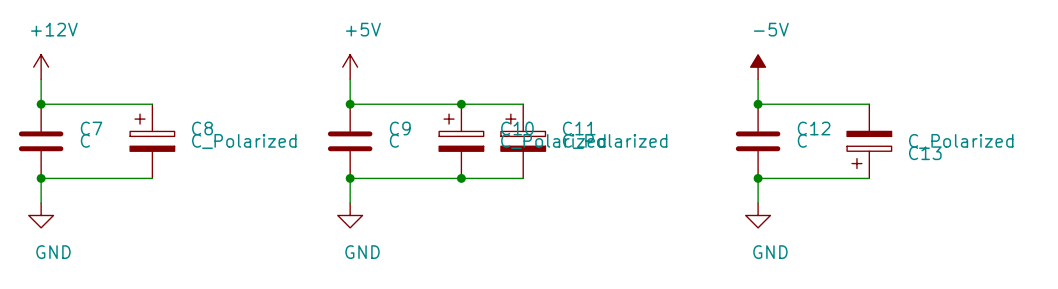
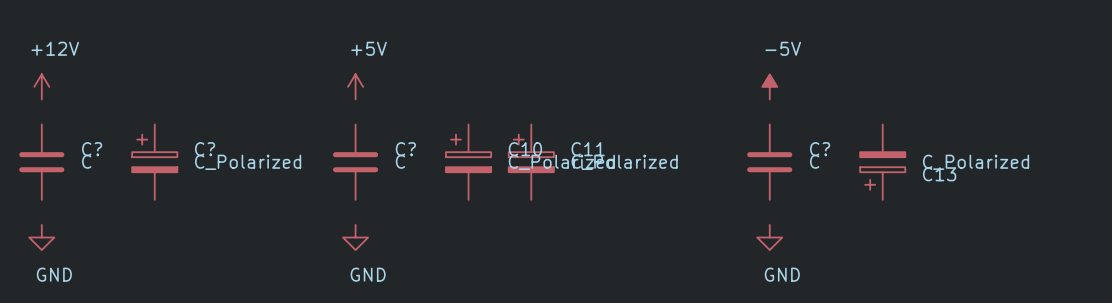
wire: (41, 79) (41, 104) (152, 104) -> none
wire: (350, 79) (350, 104) (523, 104) -> none
wire: (758, 79) (758, 104) (869, 104) -> none
junction: (41, 104) -> none
junction: (350, 104) -> none
junction: (461, 104) -> none
junction: (758, 104) -> none
C7 name: C7 (91, 128) -> C? (92, 149)
C8 name: C8 (202, 128) -> C? (205, 149)
C9 name: C9 (400, 128) -> C? (405, 149)
C12 name: C12 (814, 128) -> C? (820, 149)
junction: (41, 178) -> none
wire: (152, 178) (41, 178) (41, 203) -> none
junction: (350, 178) -> none
junction: (461, 178) -> none
wire: (523, 178) (350, 178) (350, 203) -> none
junction: (758, 178) -> none
wire: (869, 178) (758, 178) (758, 203) -> none

